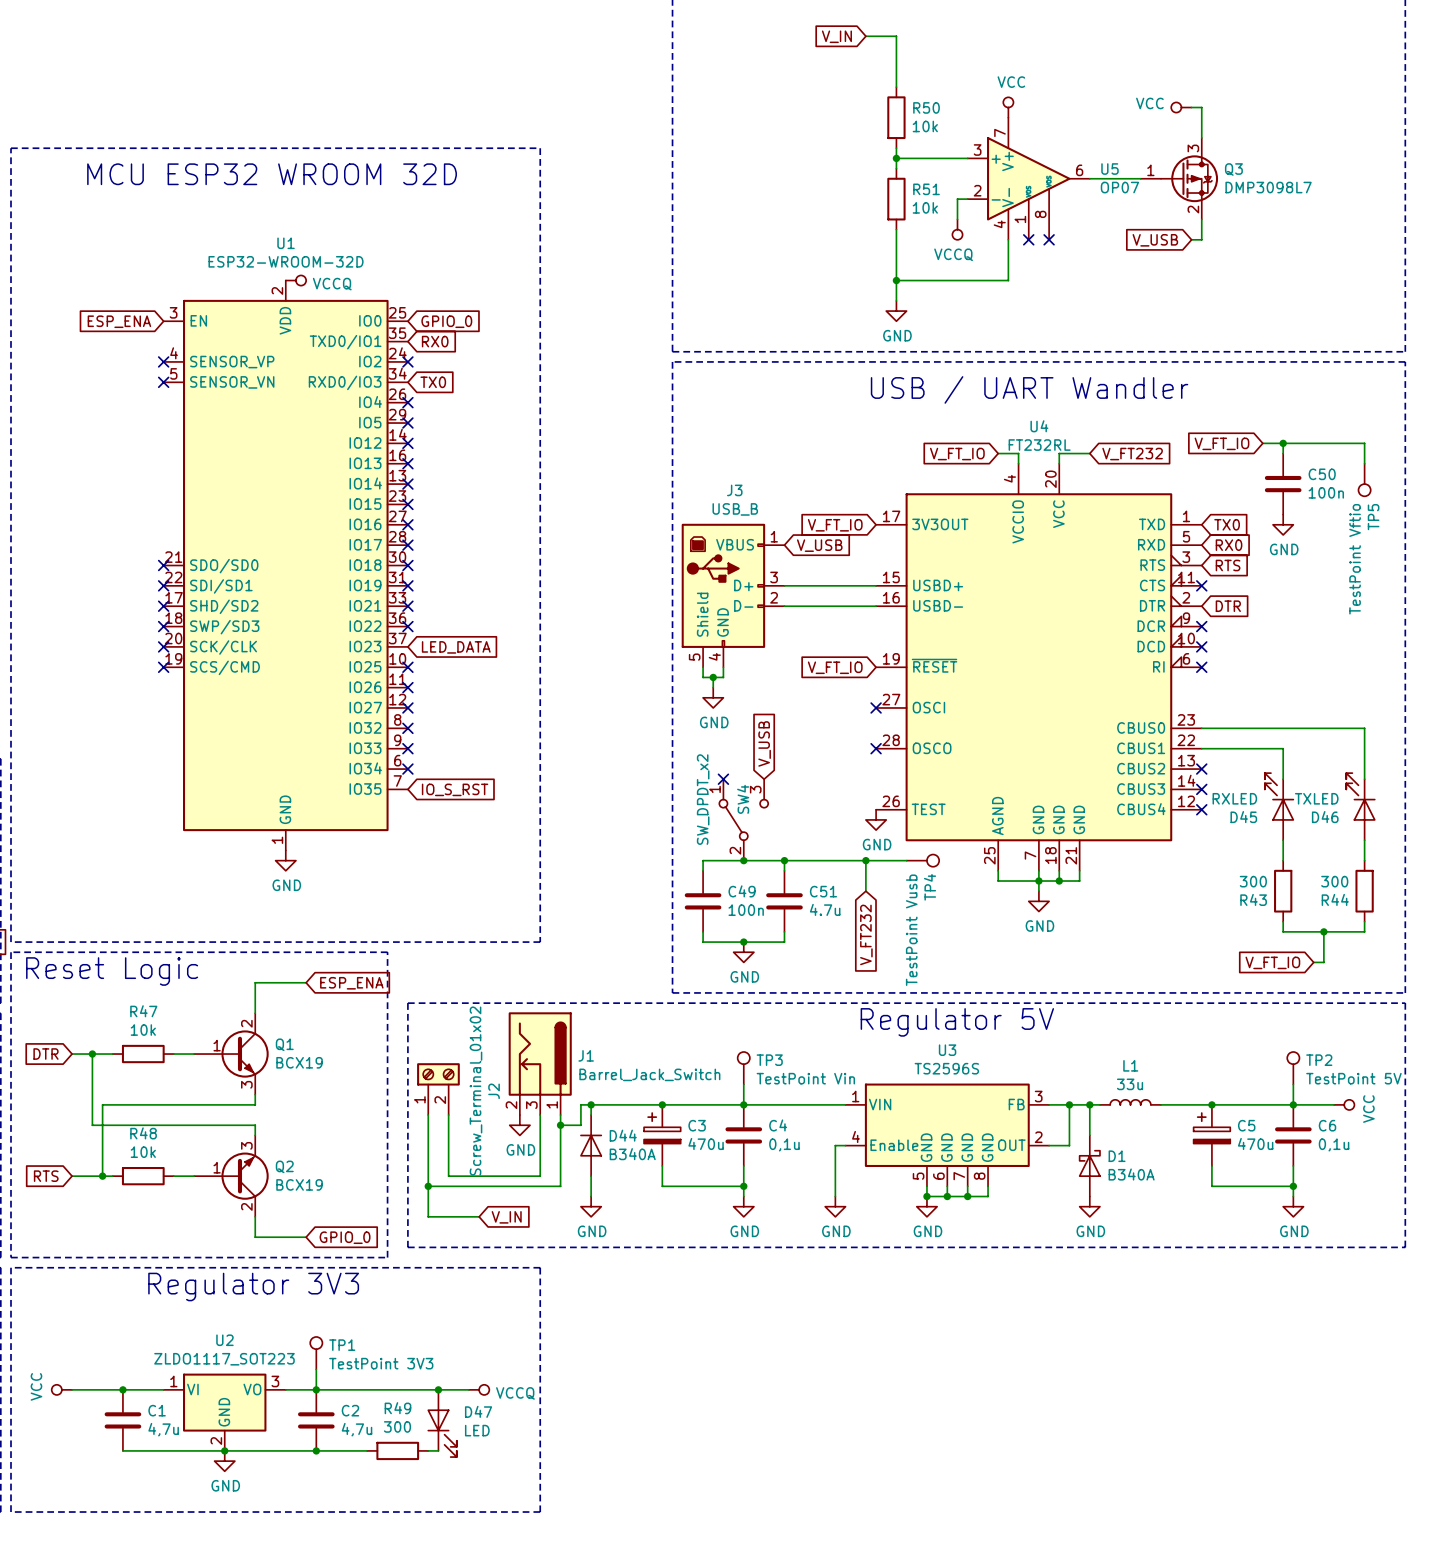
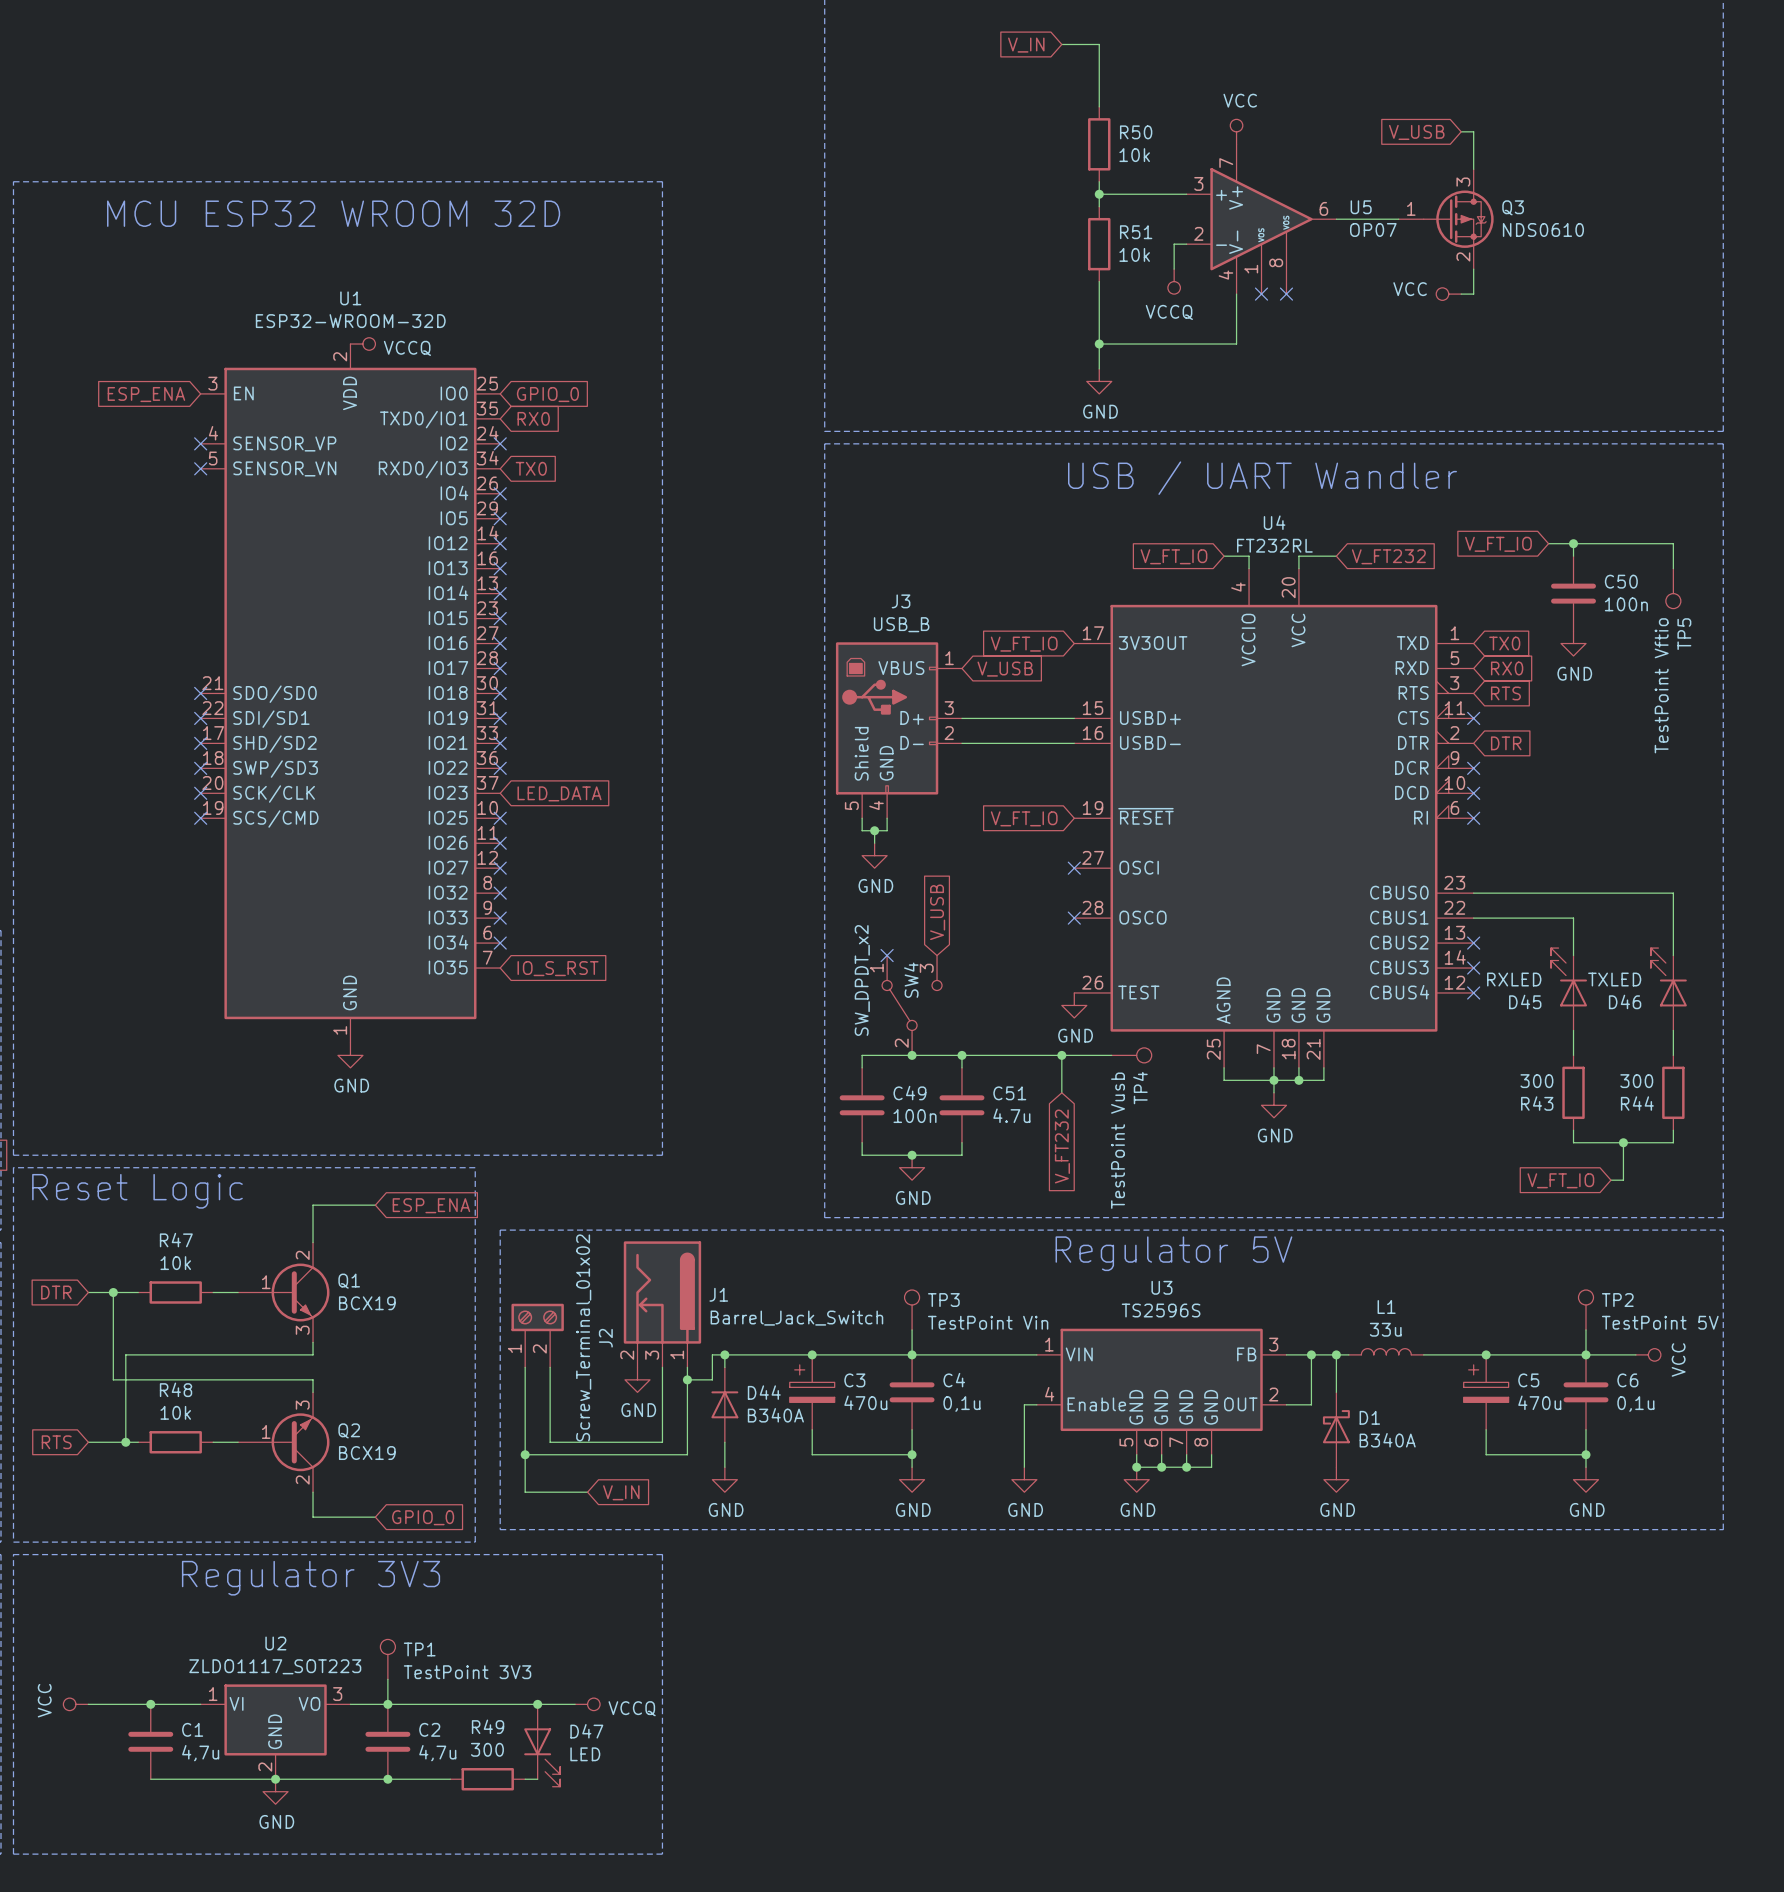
power symbol position: VCC (1181, 107) -> VCC (1448, 294)
Q3 value: DMP3098L7 (1268, 187) -> NDS0610 (1543, 229)
global label position: V_USB (1155, 240) -> V_USB (1416, 132)

